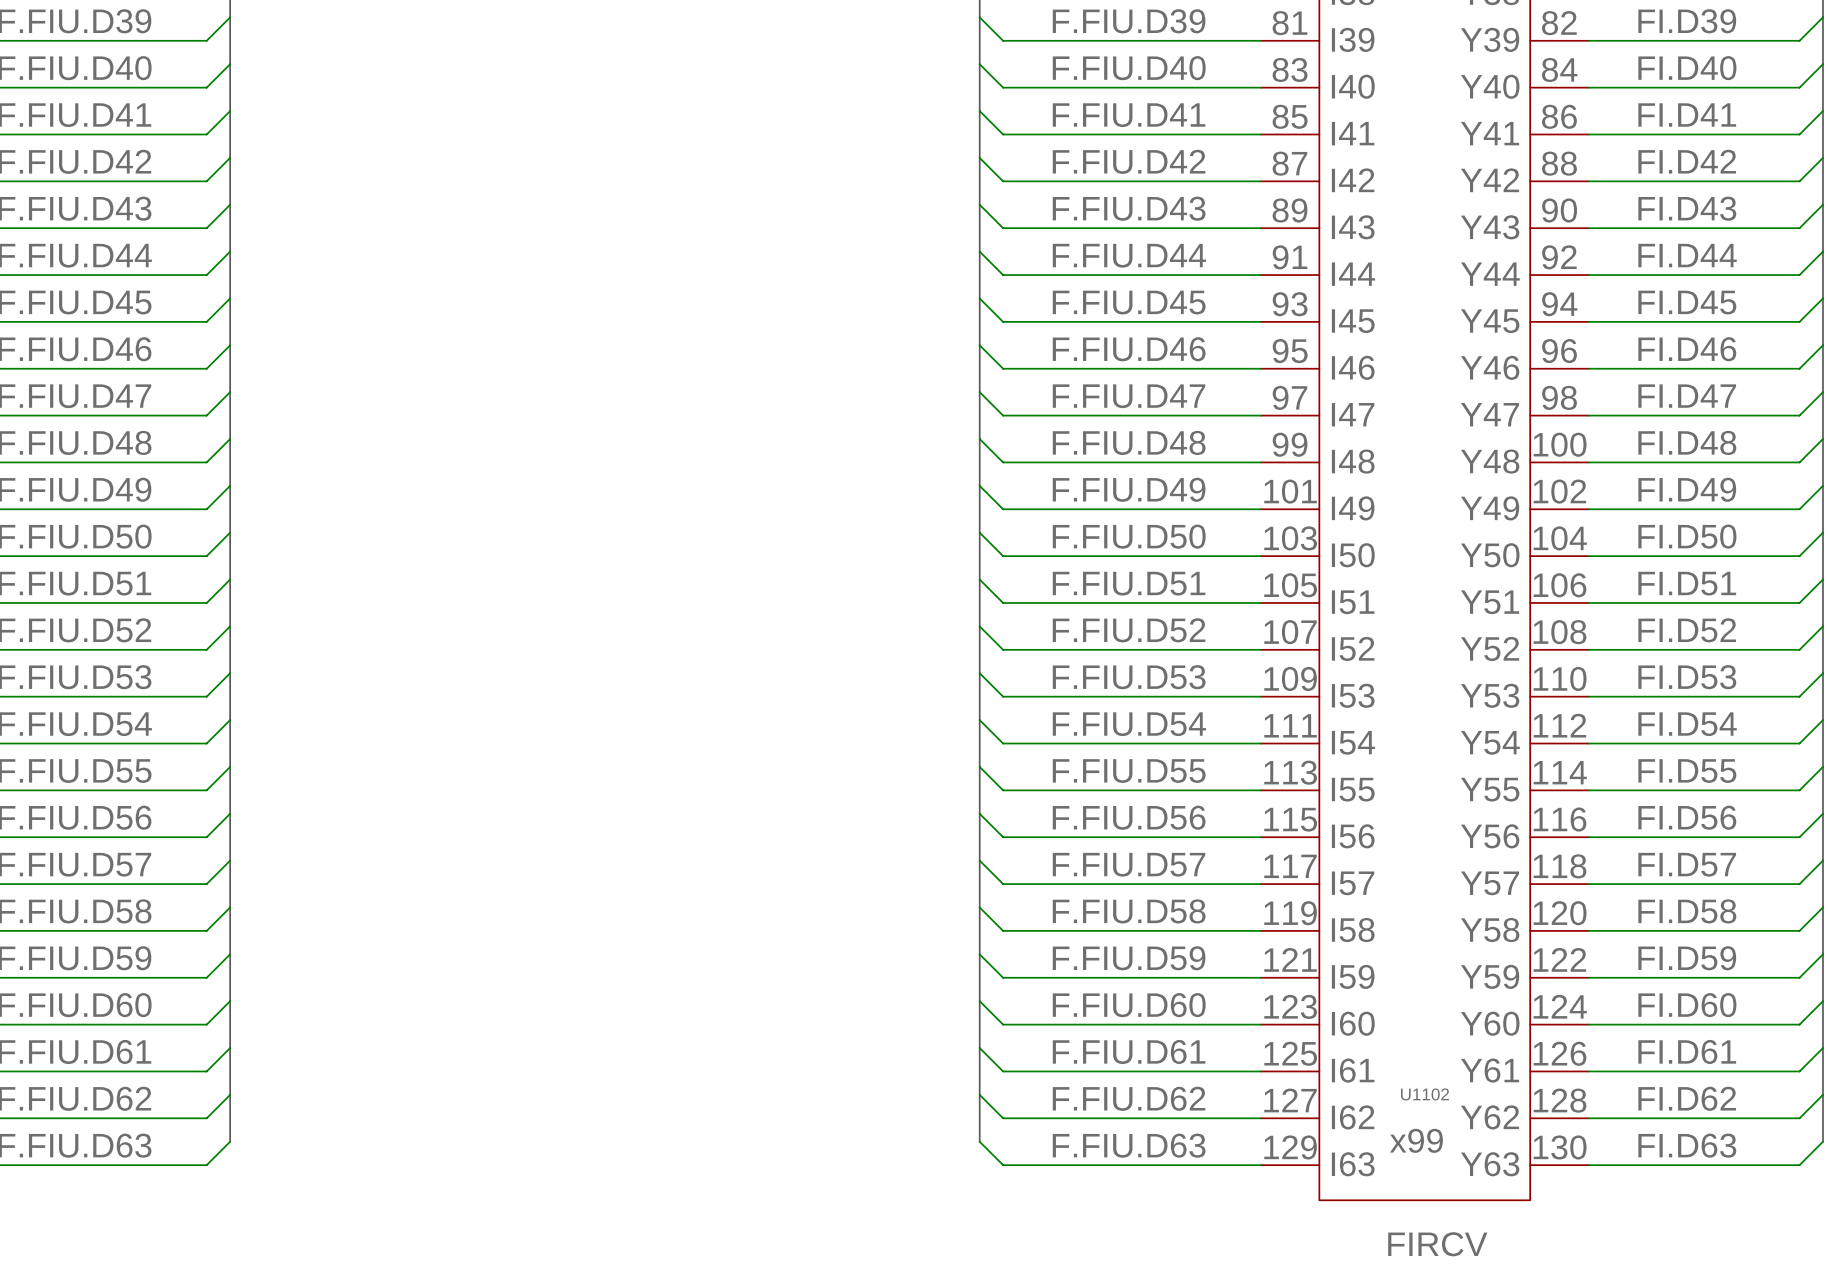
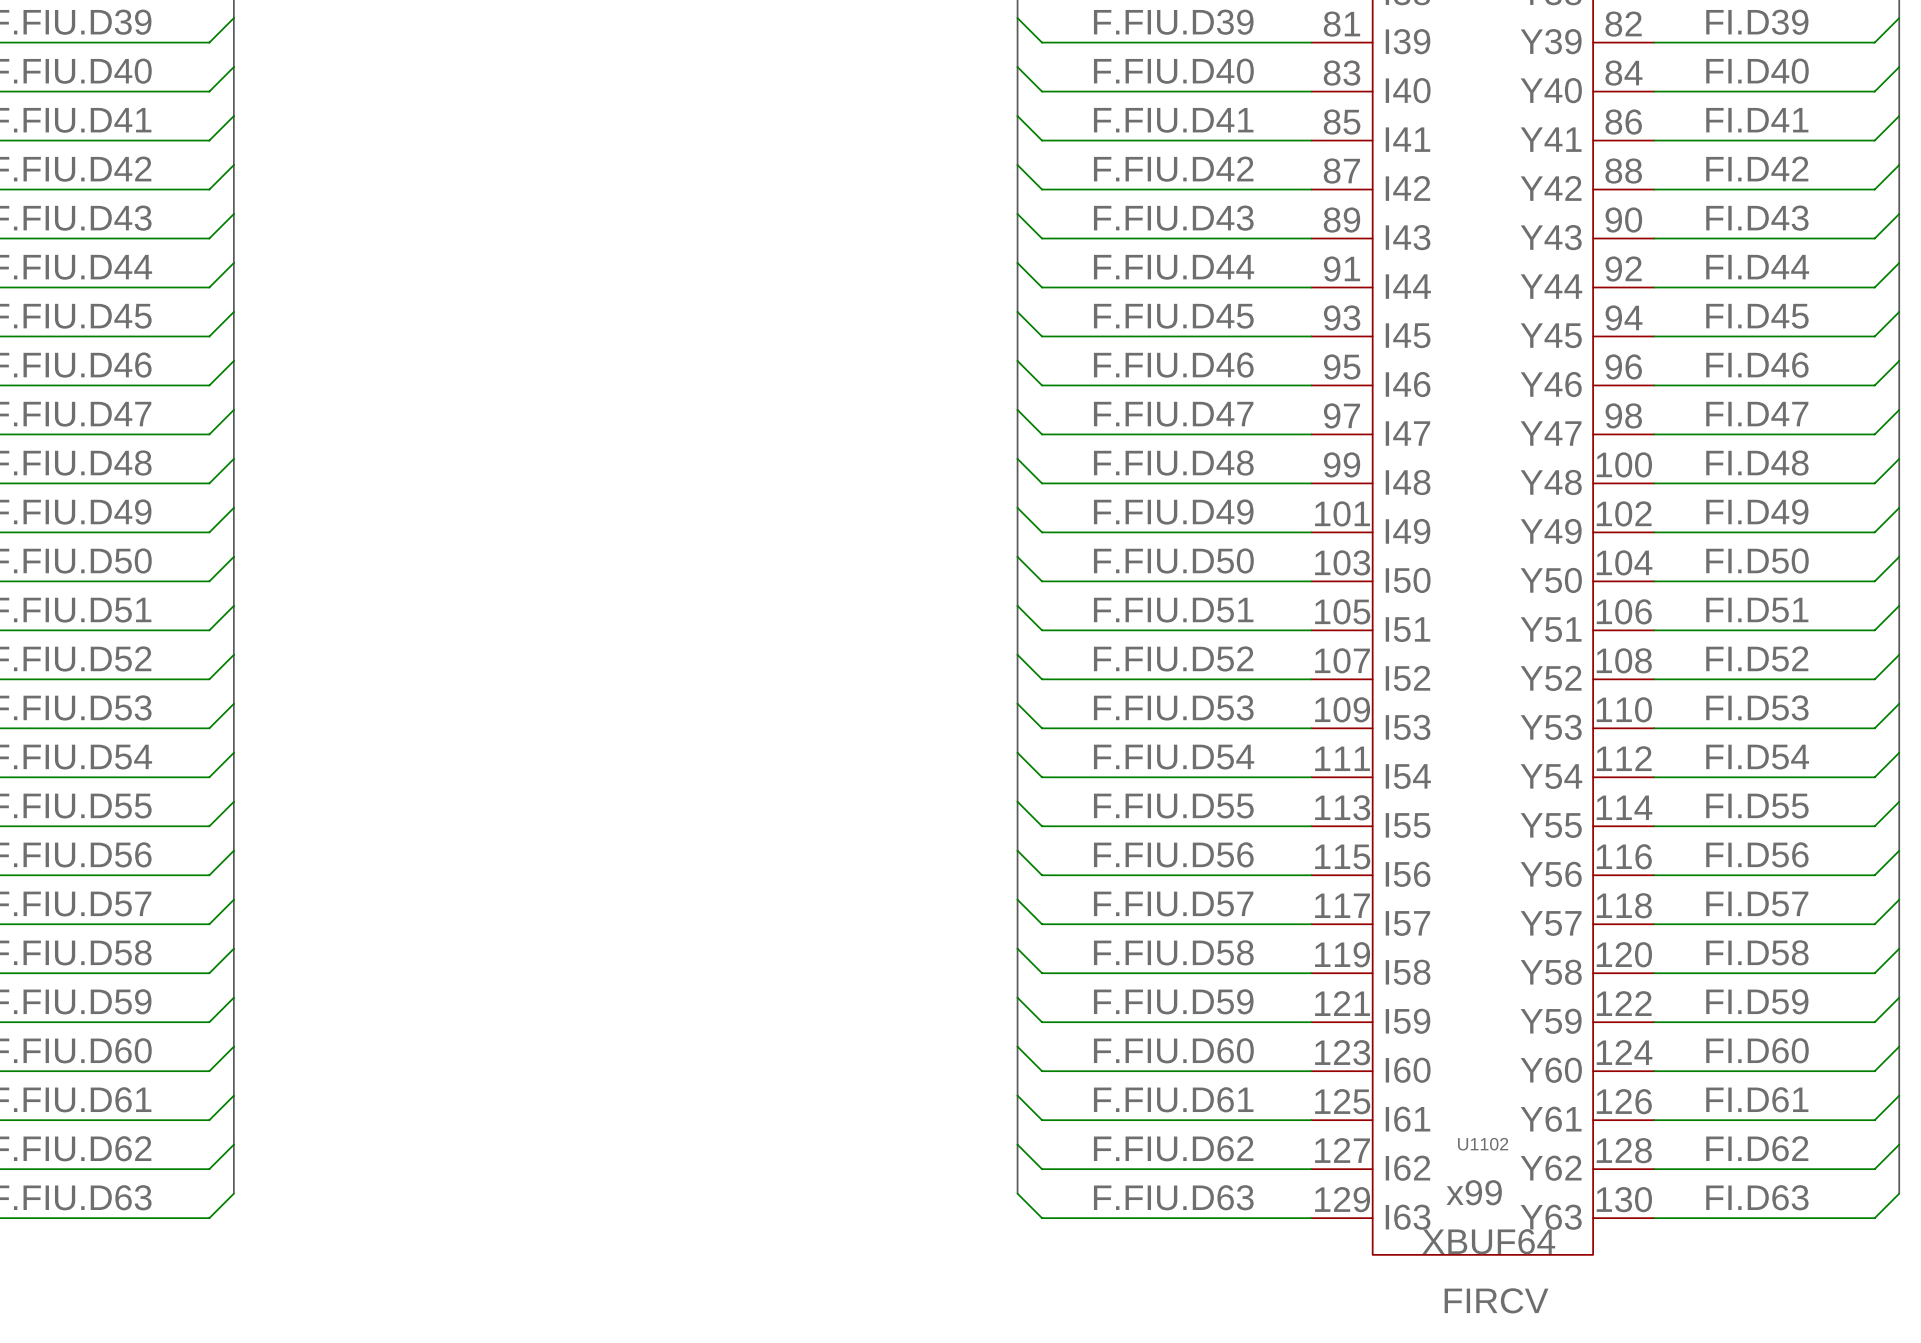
U1102 value: none -> XBUF64 (1488, 1241)

